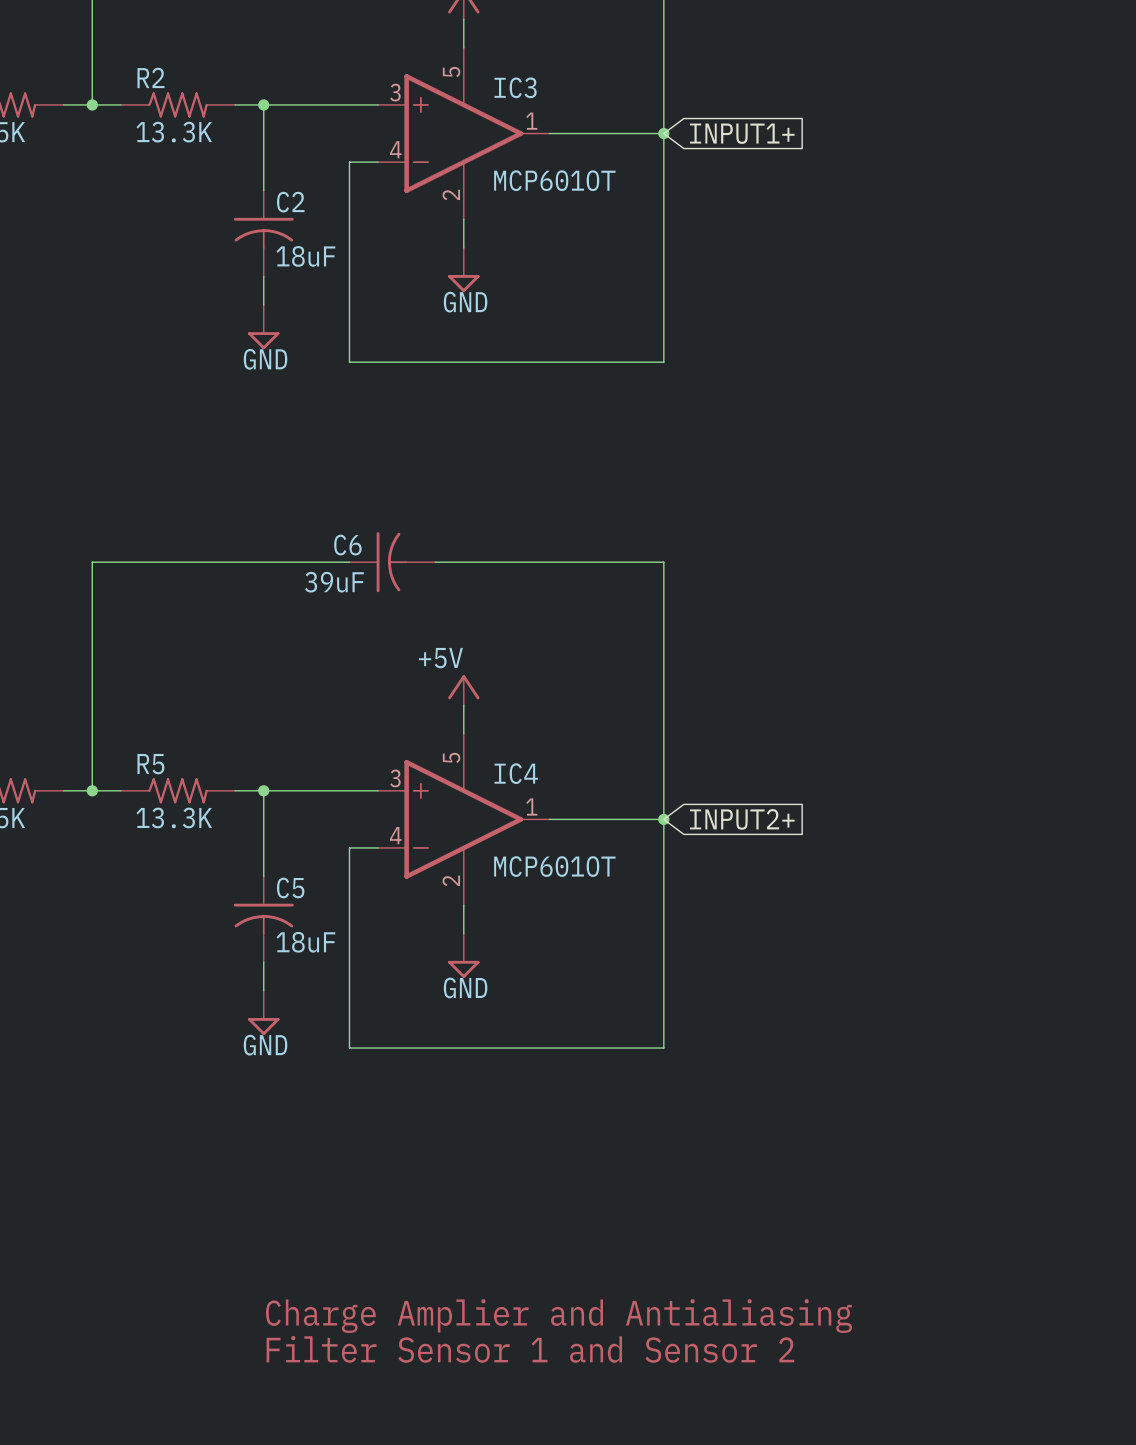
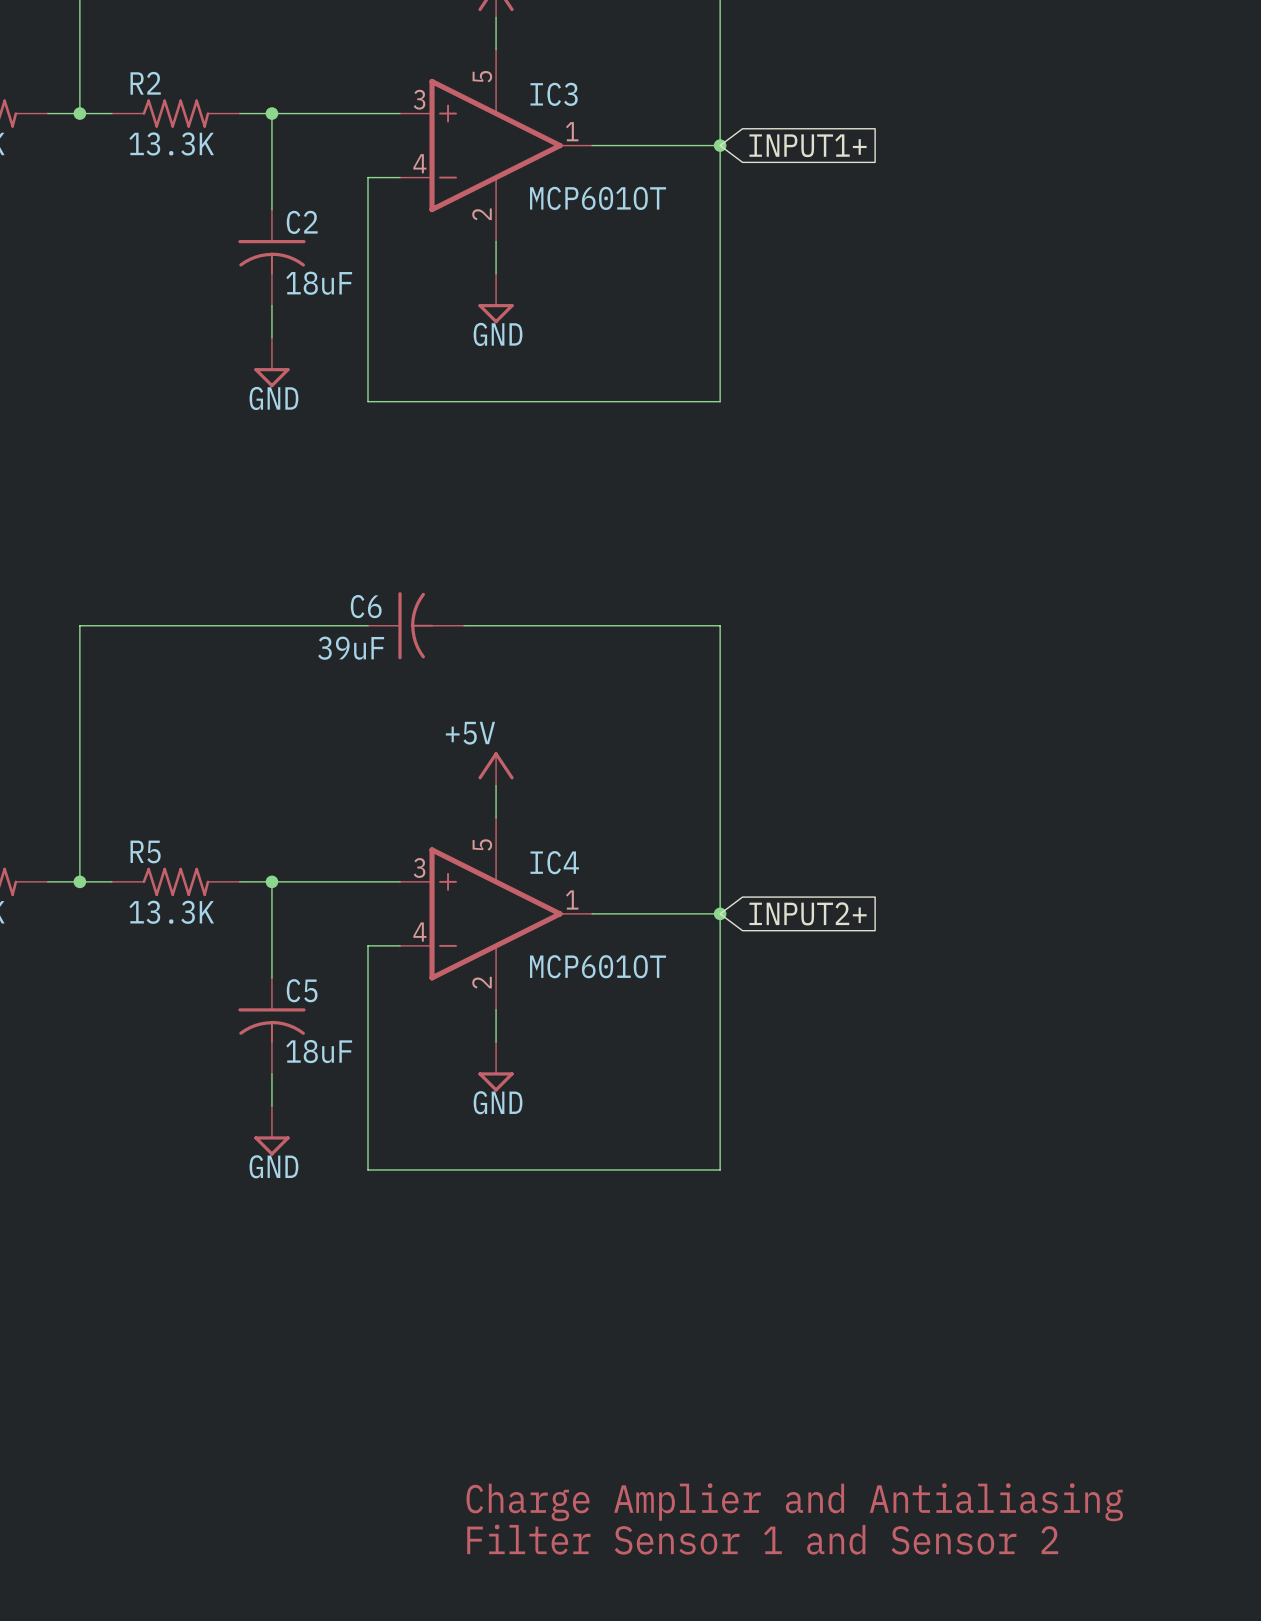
text position: Charge Amplier and Antialiasing (558, 1316) -> Charge Amplier and Antialiasing (794, 1502)
text position: Filter Sensor 1 and Sensor 2 (530, 1349) -> Filter Sensor 1 and Sensor 2 (762, 1539)

